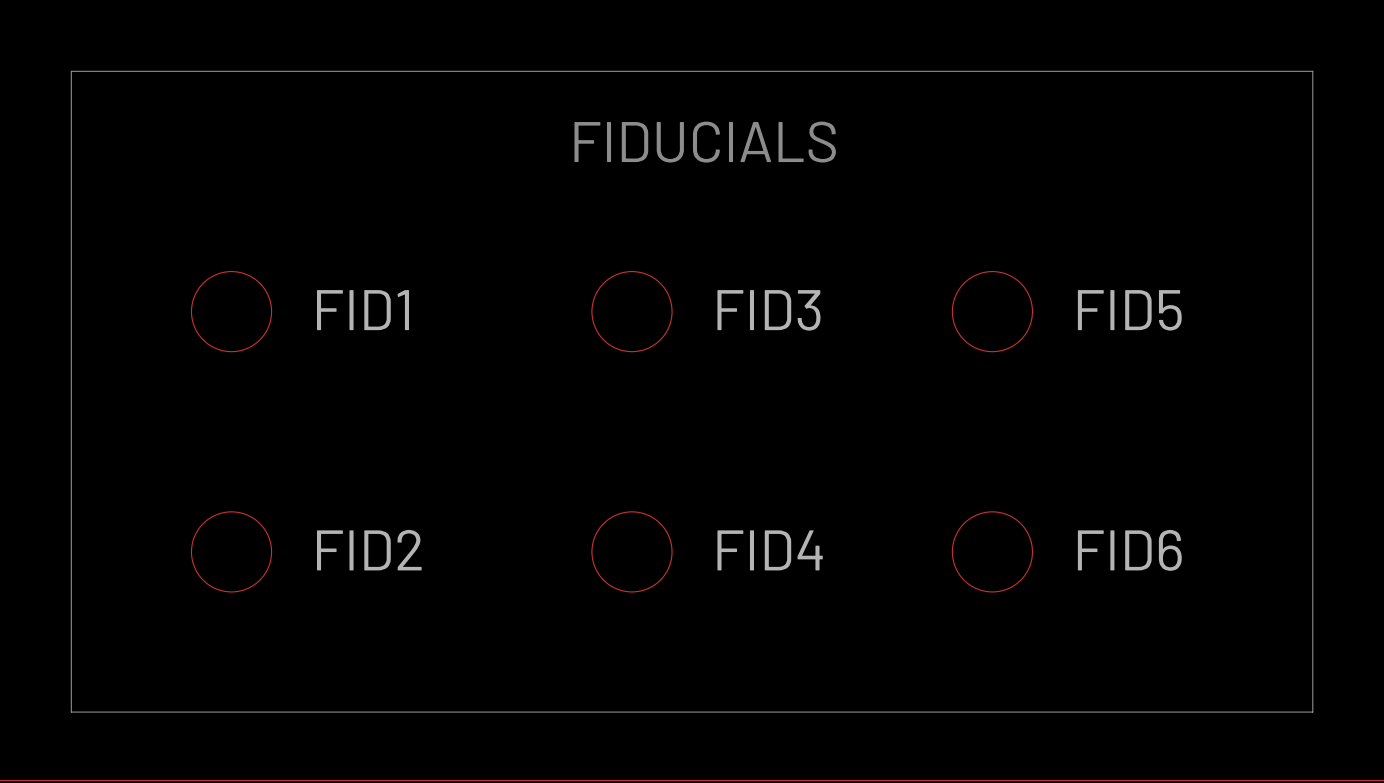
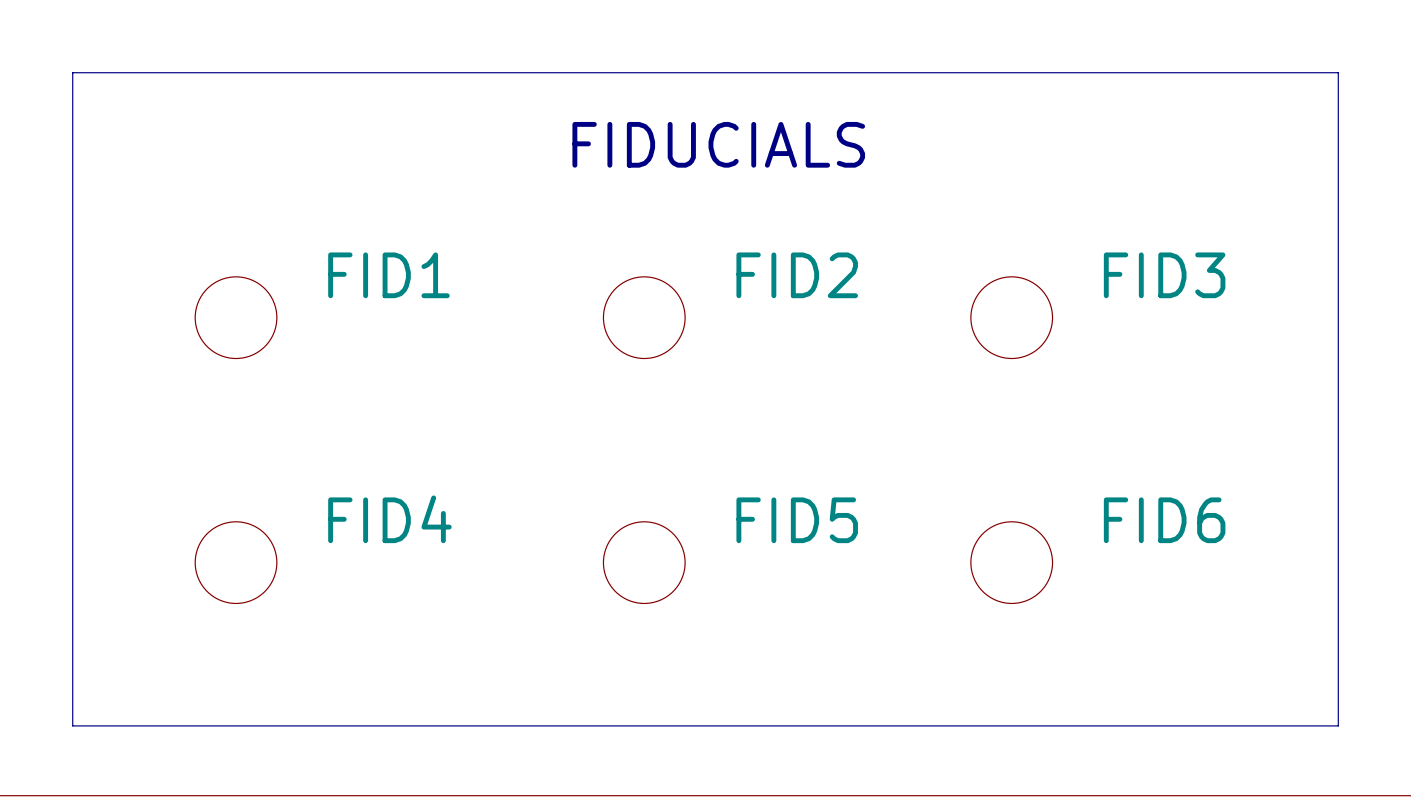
FID1 name position: FID1 (362, 310) -> FID1 (388, 275)
FID3 name: FID3 (768, 310) -> FID2 (797, 275)
FID5 name: FID5 (1129, 310) -> FID3 (1164, 275)
FID2 name: FID2 (369, 550) -> FID4 (389, 519)
FID4 name: FID4 (770, 550) -> FID5 (797, 520)
FID6 name position: FID6 (1129, 550) -> FID6 (1164, 520)

